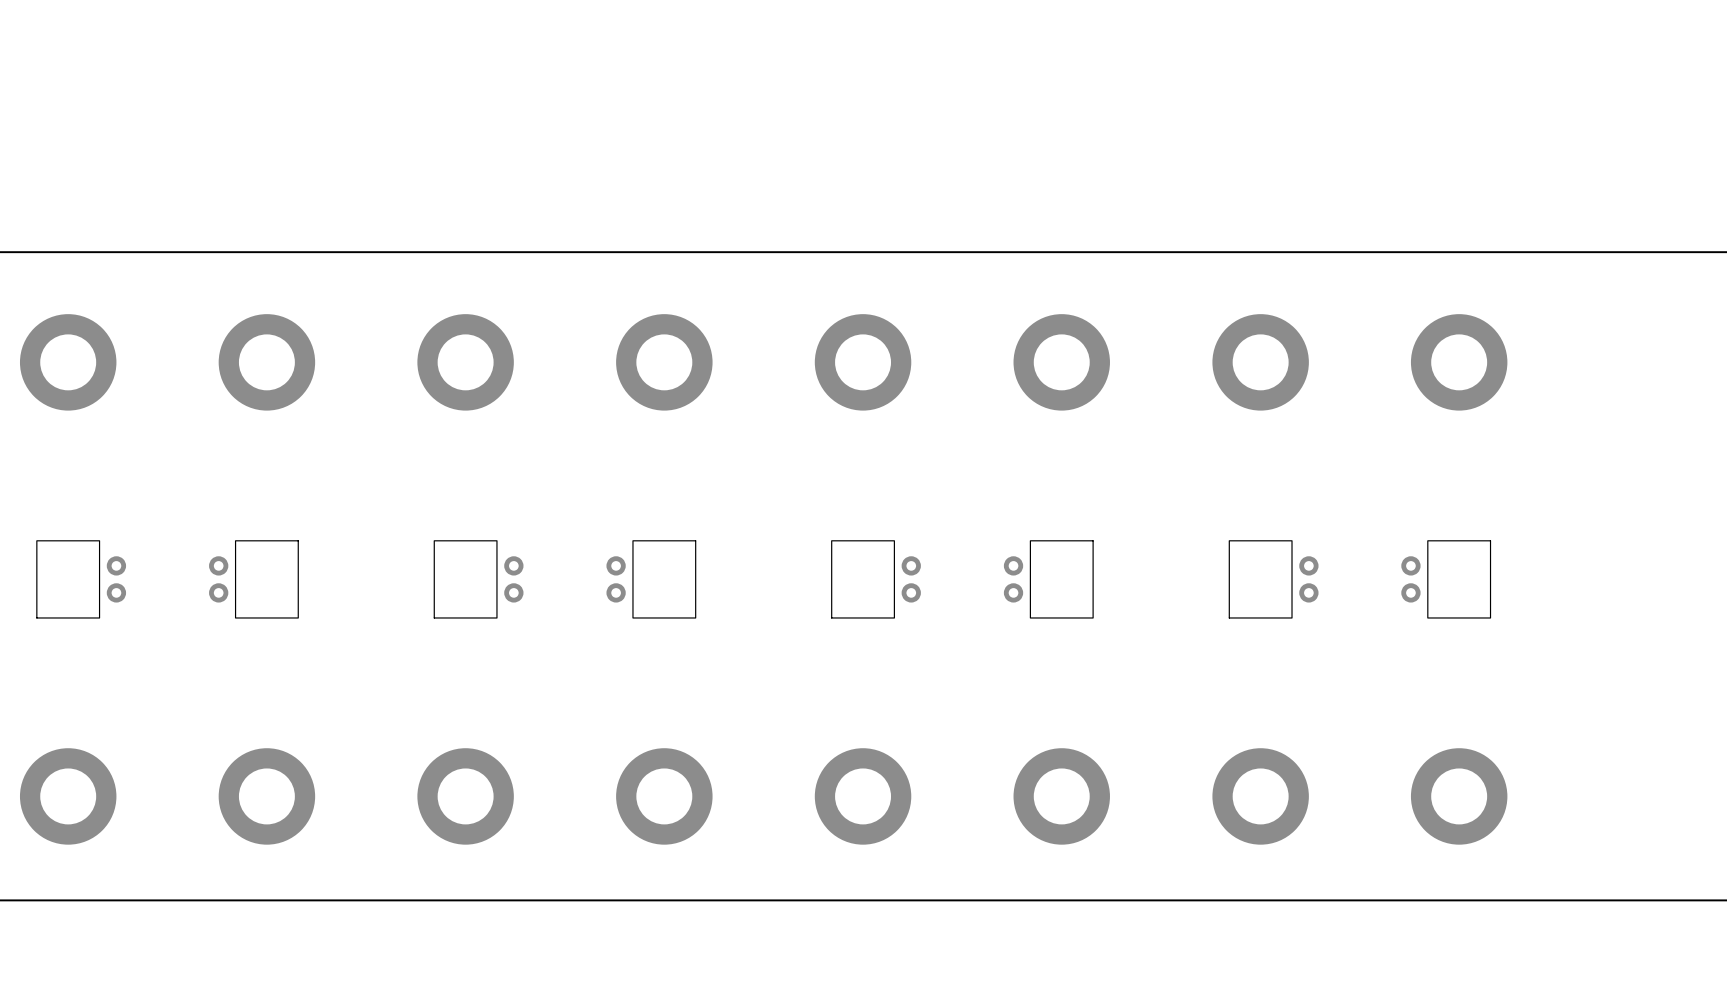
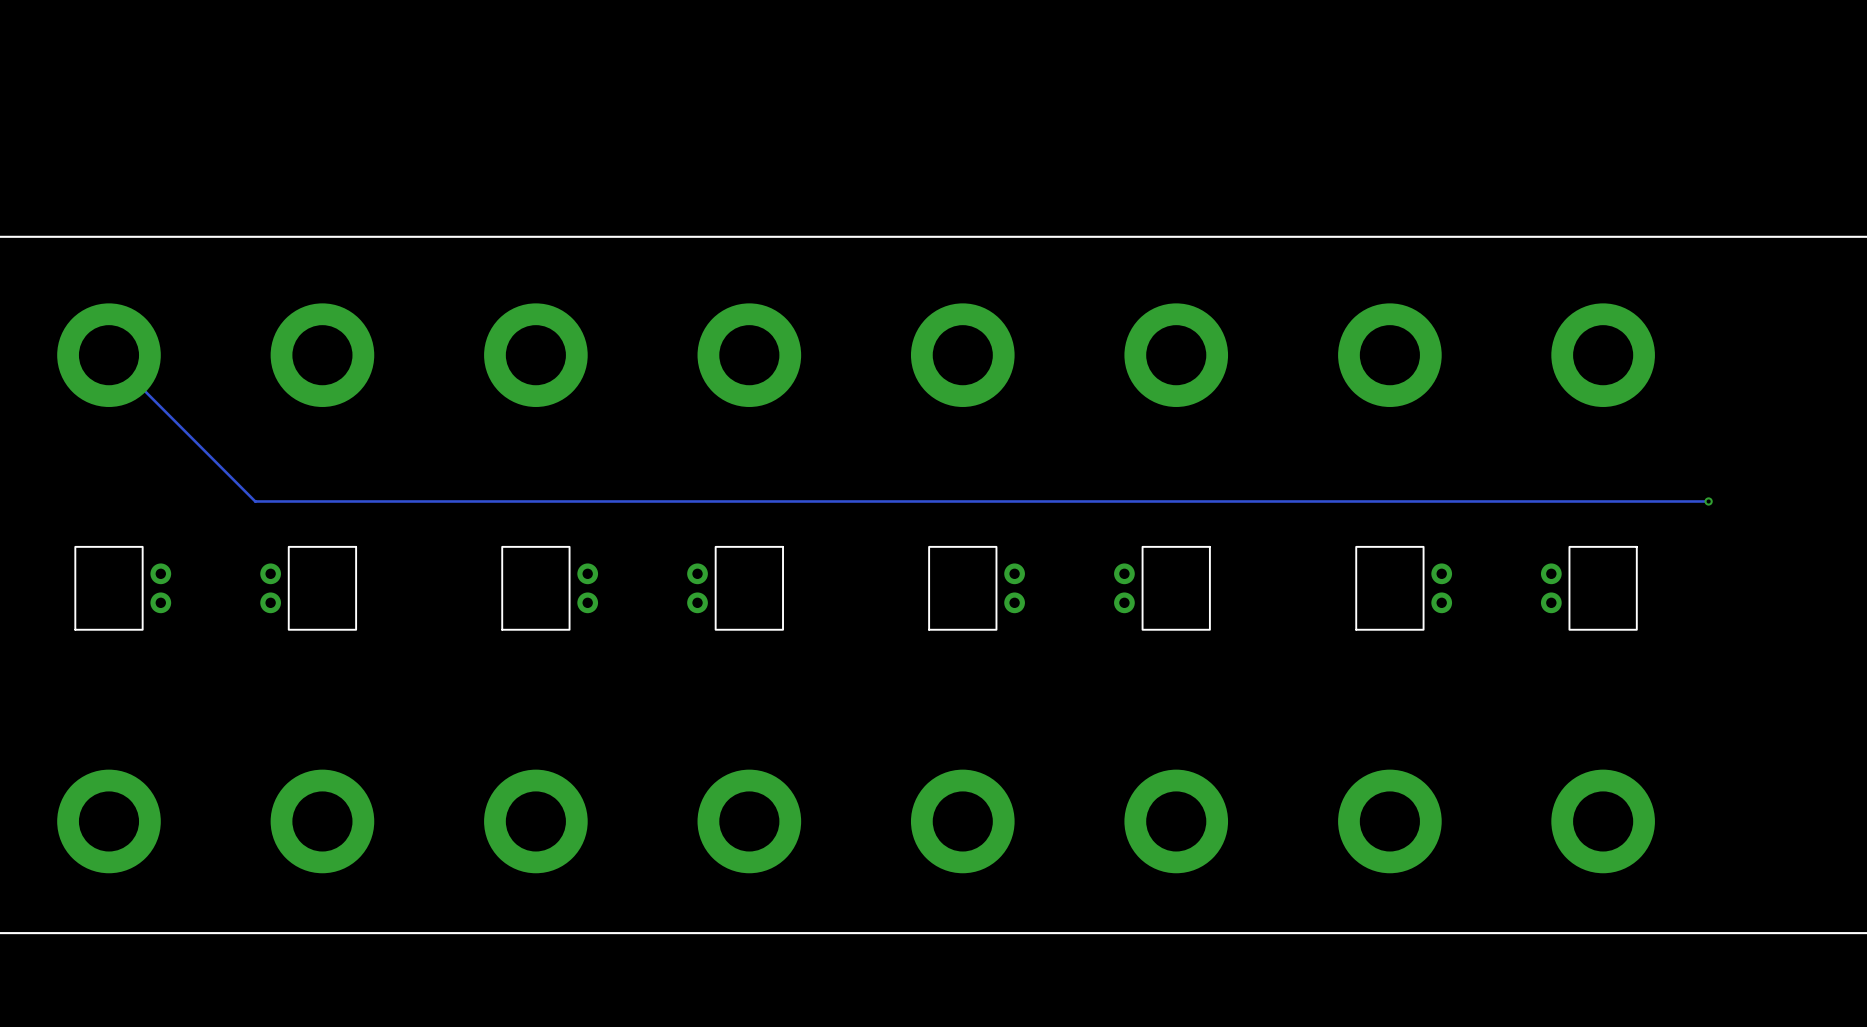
track: none -> (108, 355) (255, 501) (1708, 501)
via: none -> (1708, 501)

